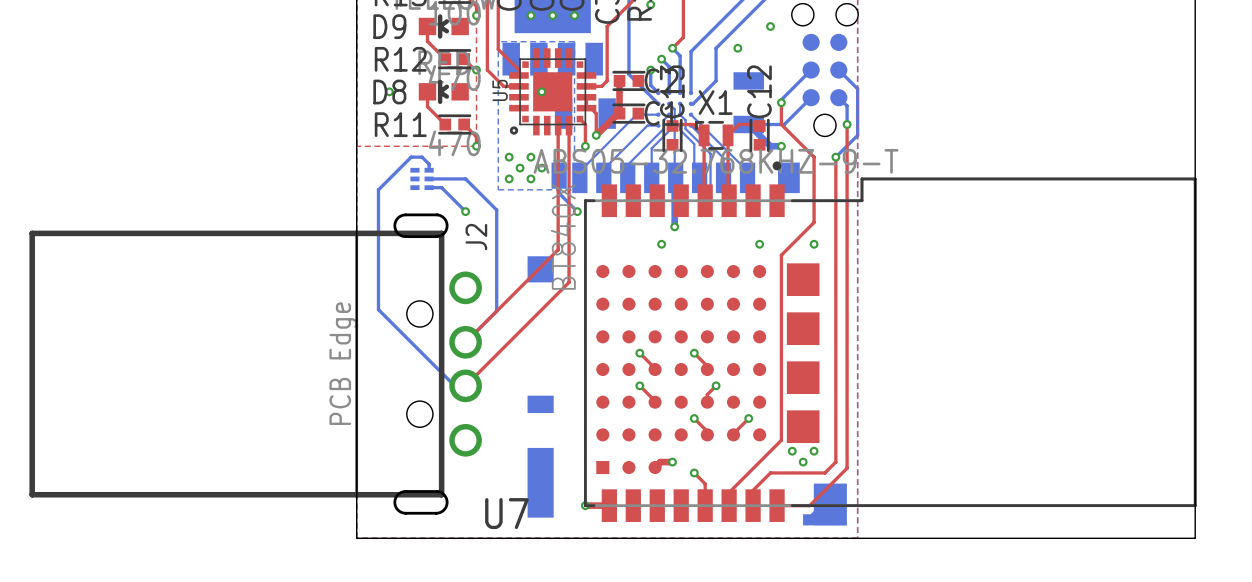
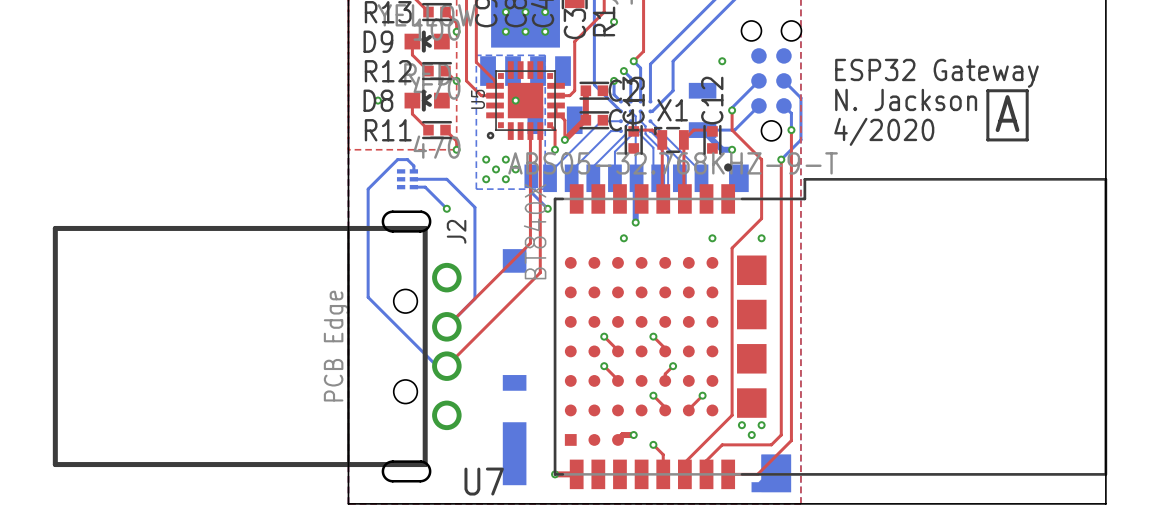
via: (770, 26) -> none
via: (737, 48) -> none
via: none -> (722, 61)
text: none -> ESP32 Gateway (936, 73)
line: none -> (987, 90) (987, 139) (1027, 139) (1027, 90) (987, 90)
text: none -> N. Jackson (906, 99)
text: none -> A (1007, 113)
text: none -> 4/2020 (884, 131)

